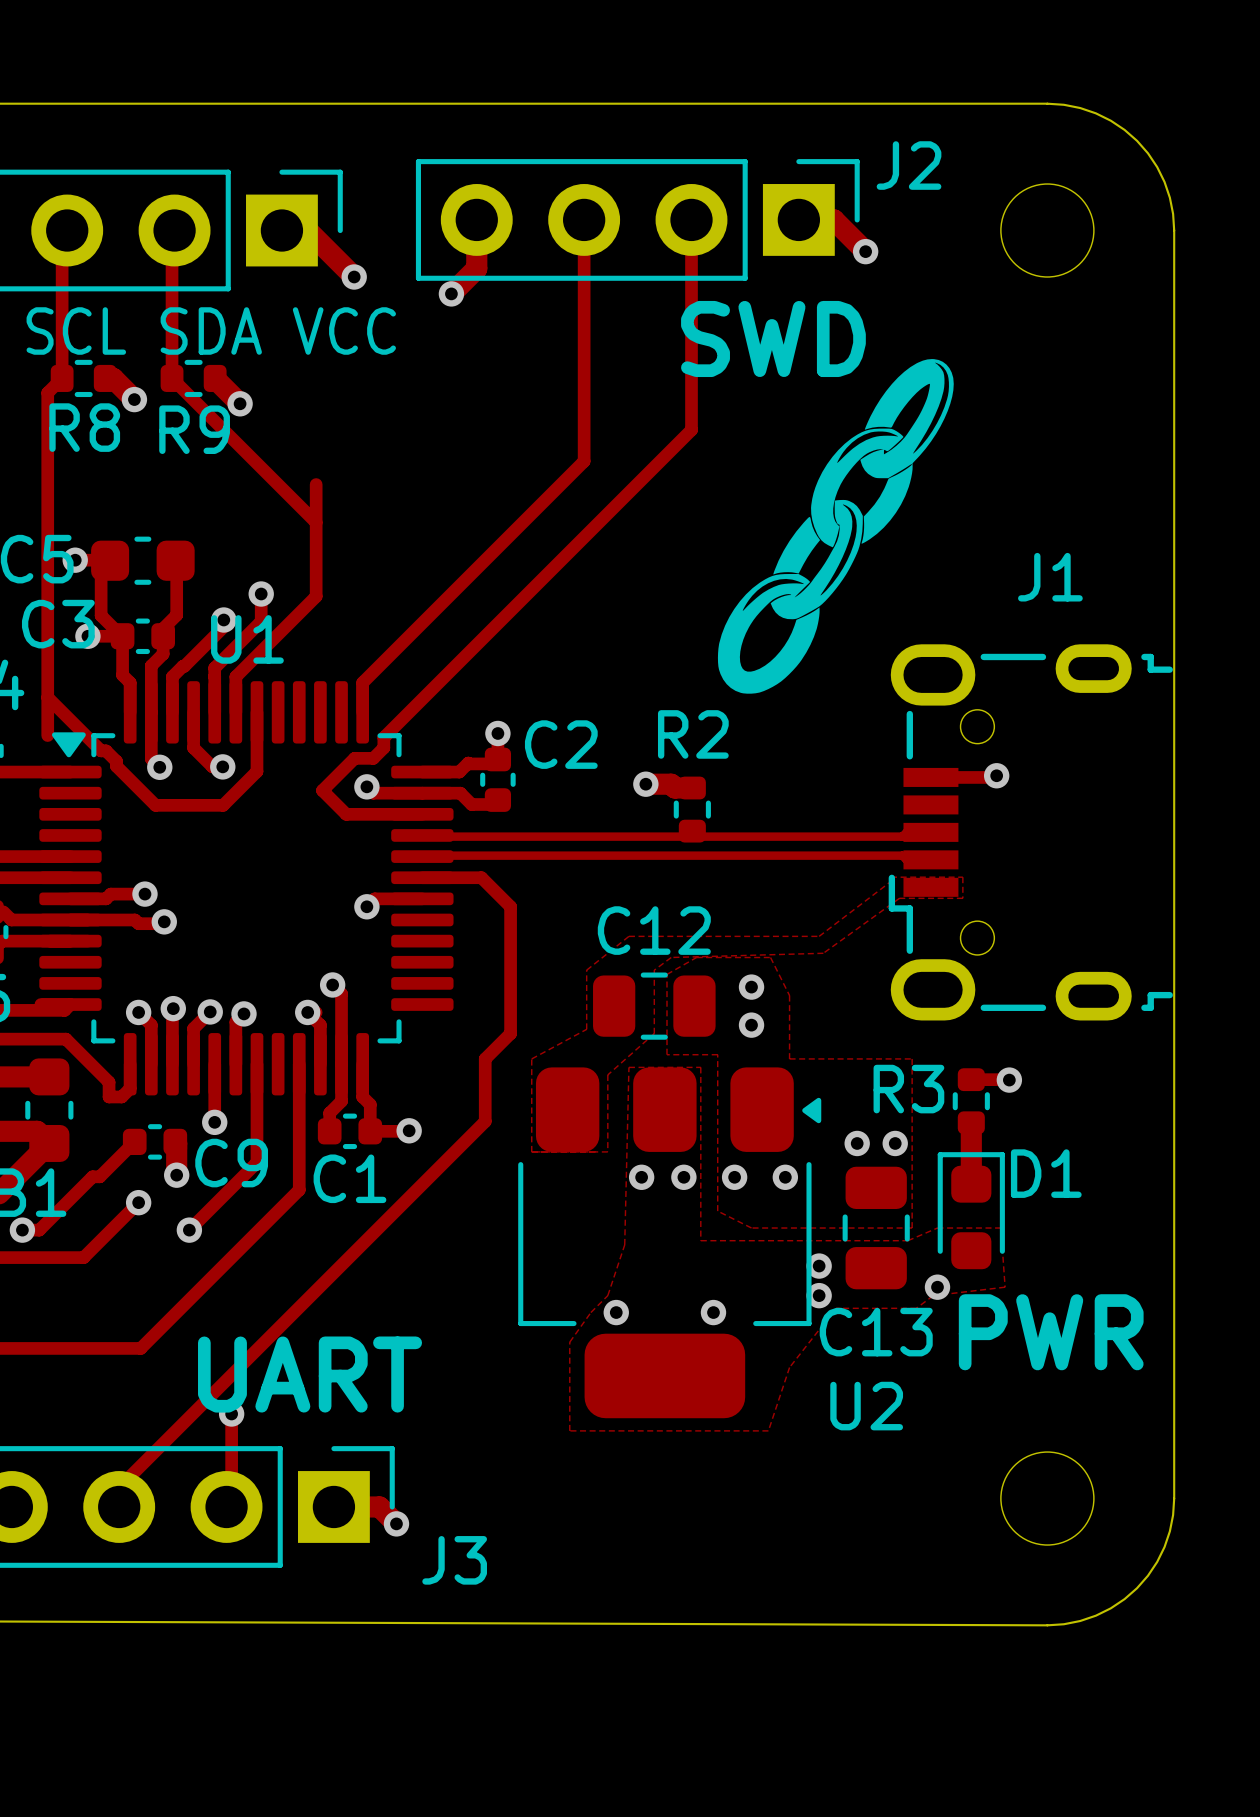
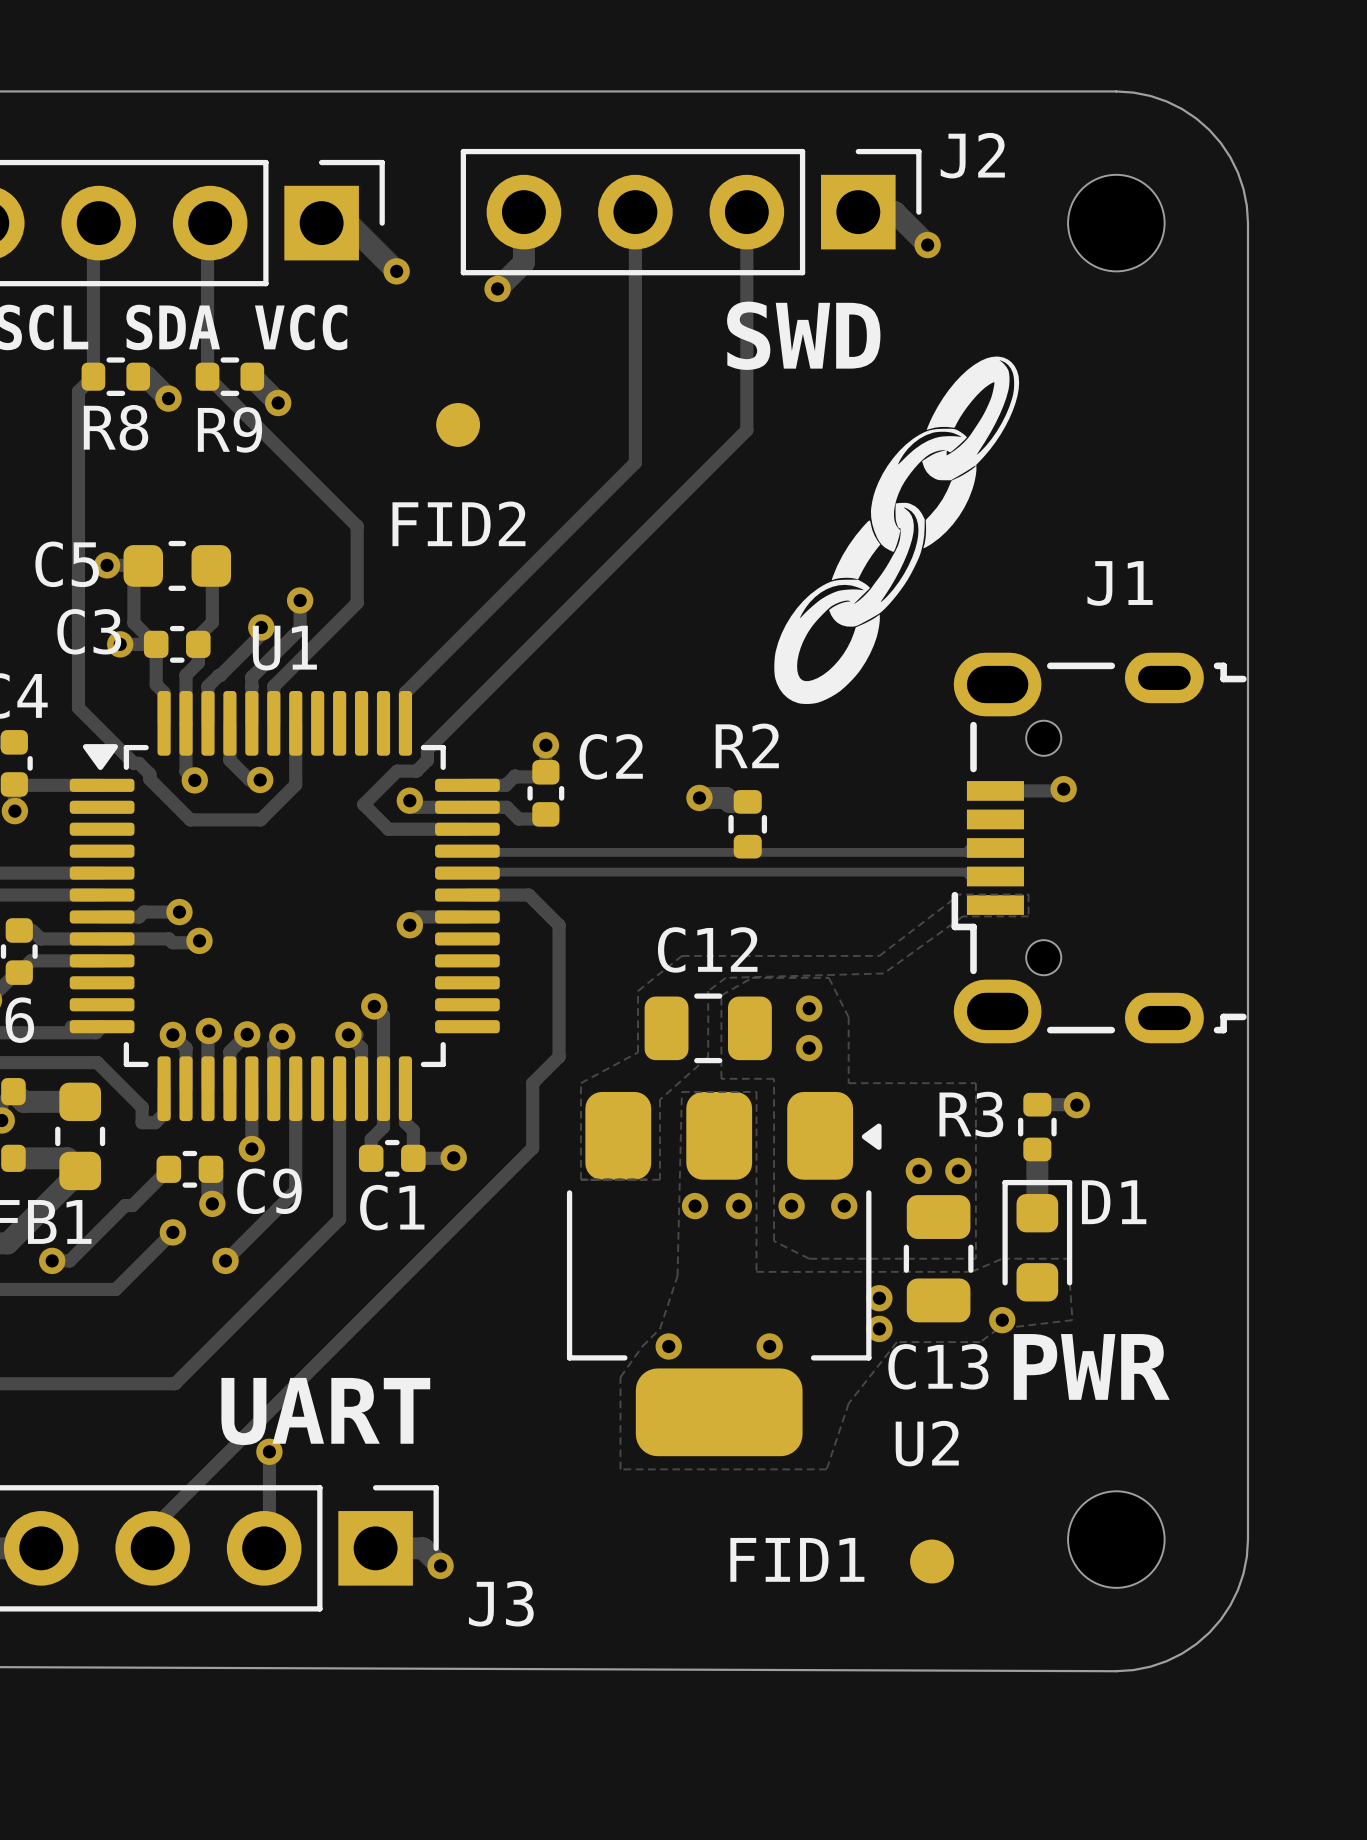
FID2: none -> (458, 424)
track: (316, 484) (316, 522) -> none
track: (47, 697) (47, 735) -> none
FID1: none -> (932, 1561)

